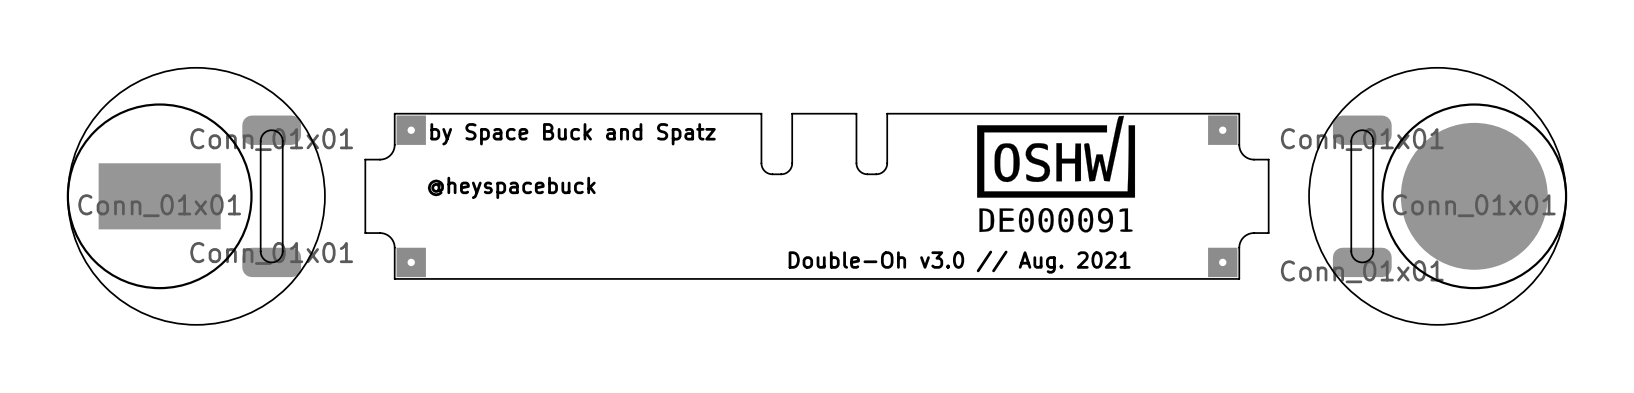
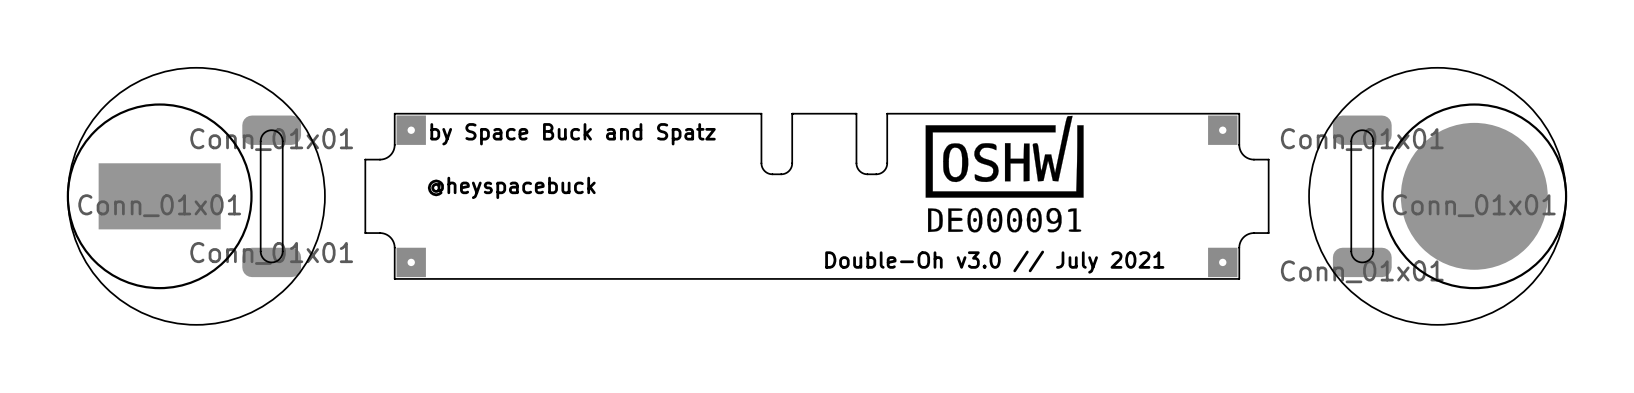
drawing position: (1056, 174) -> (1004, 174)
text: Double-Oh v3.0 // Aug. 2021 (959, 262) -> Double-Oh v3.0 // July 2021 (994, 262)

